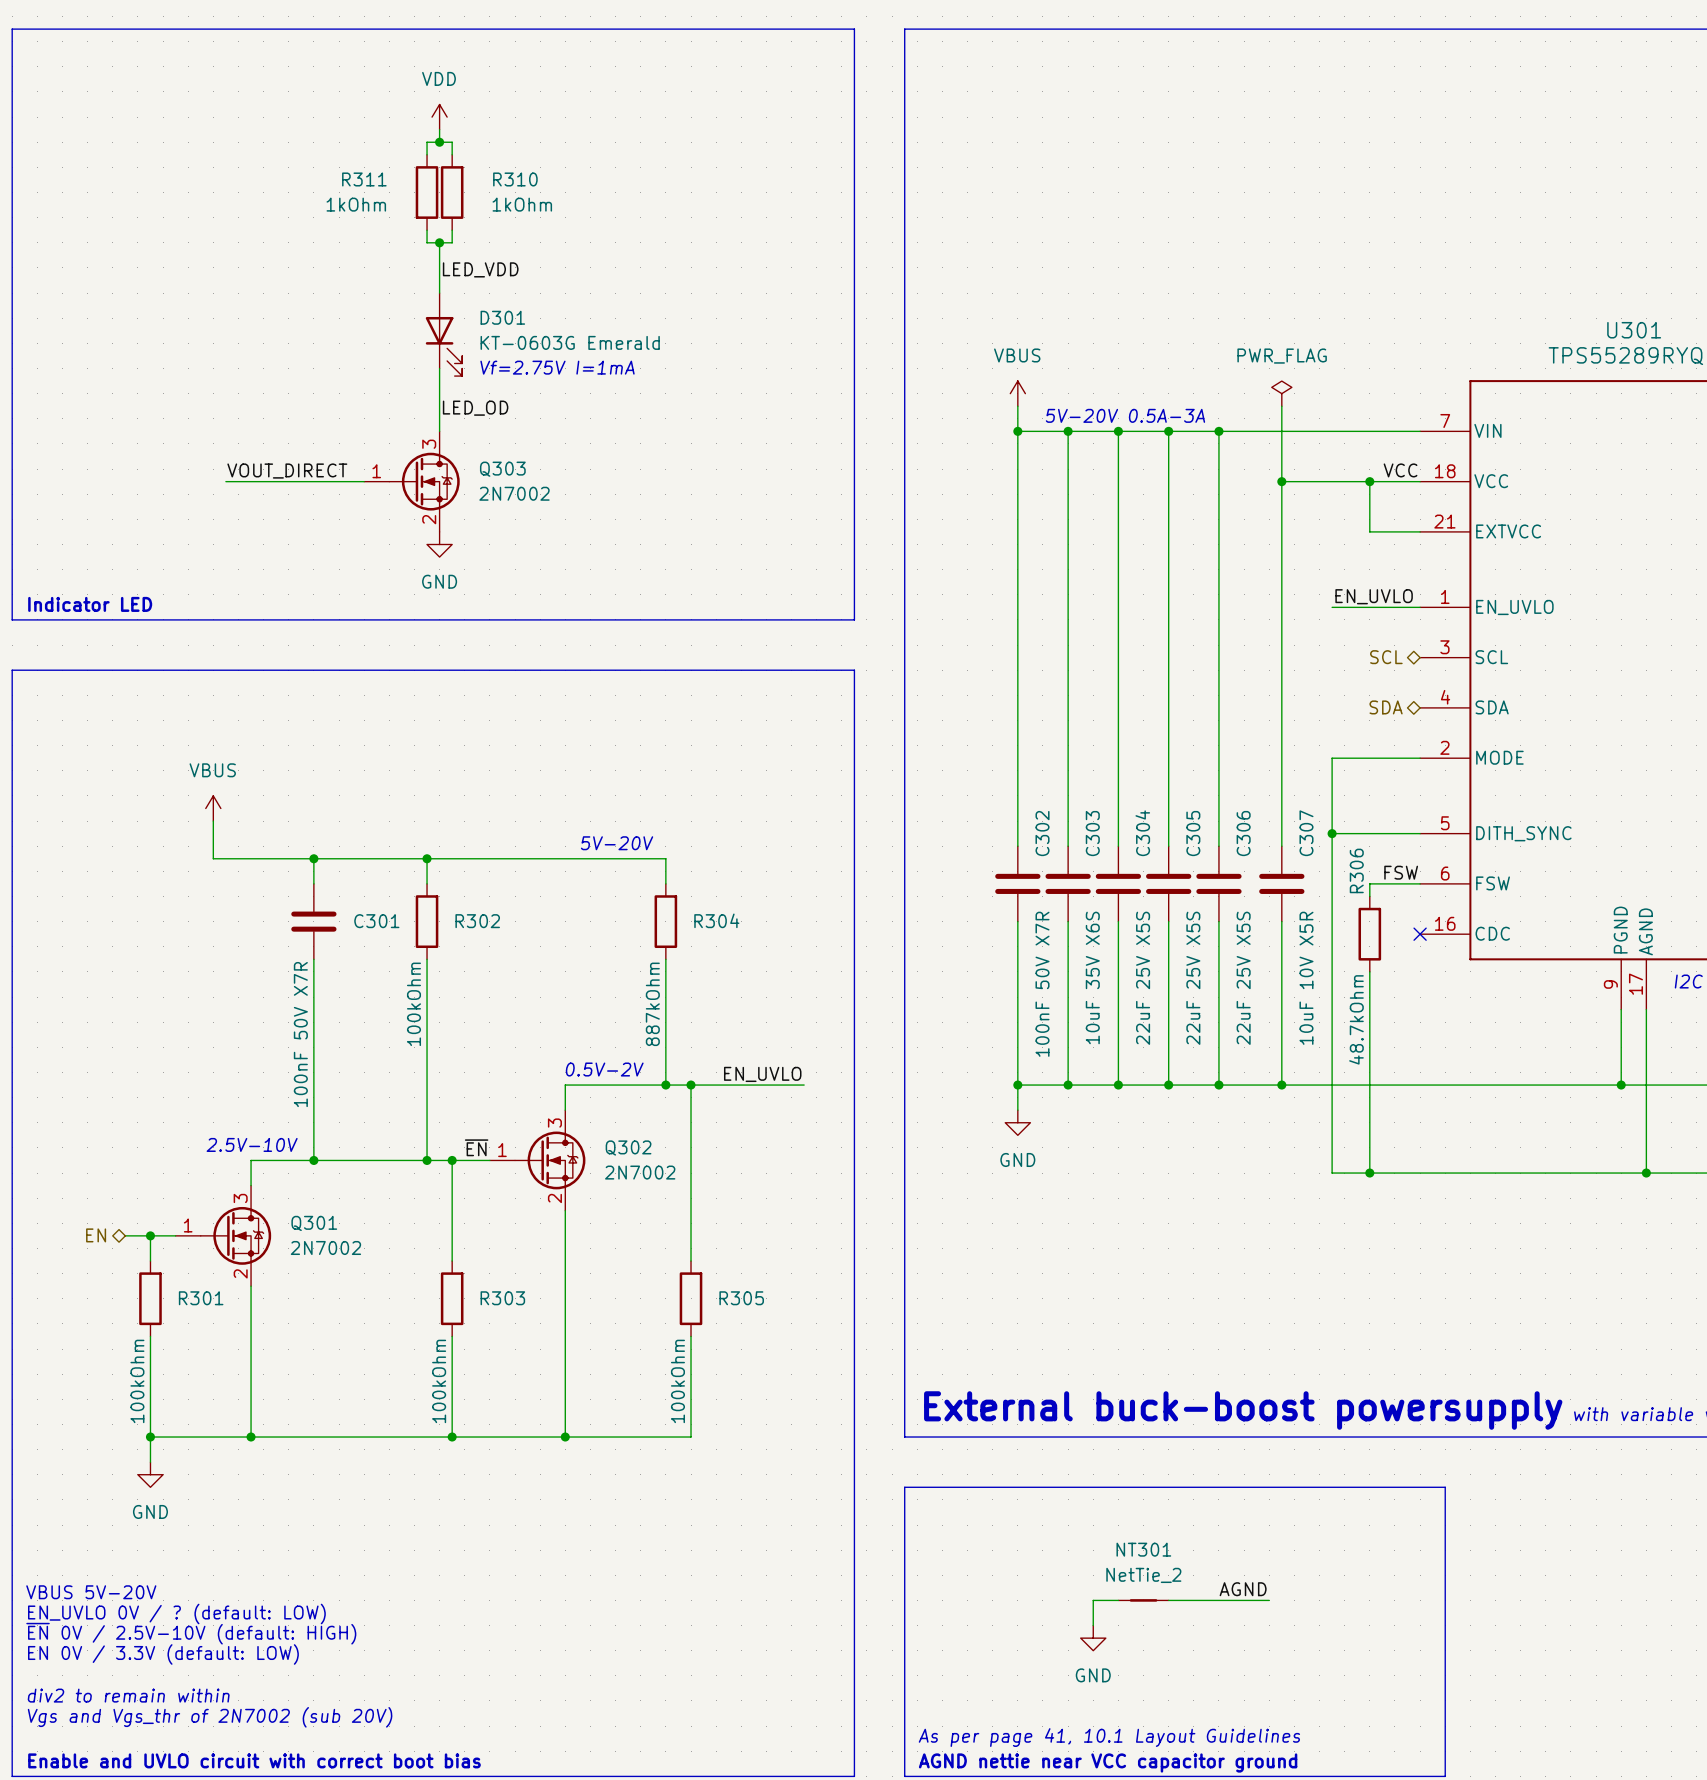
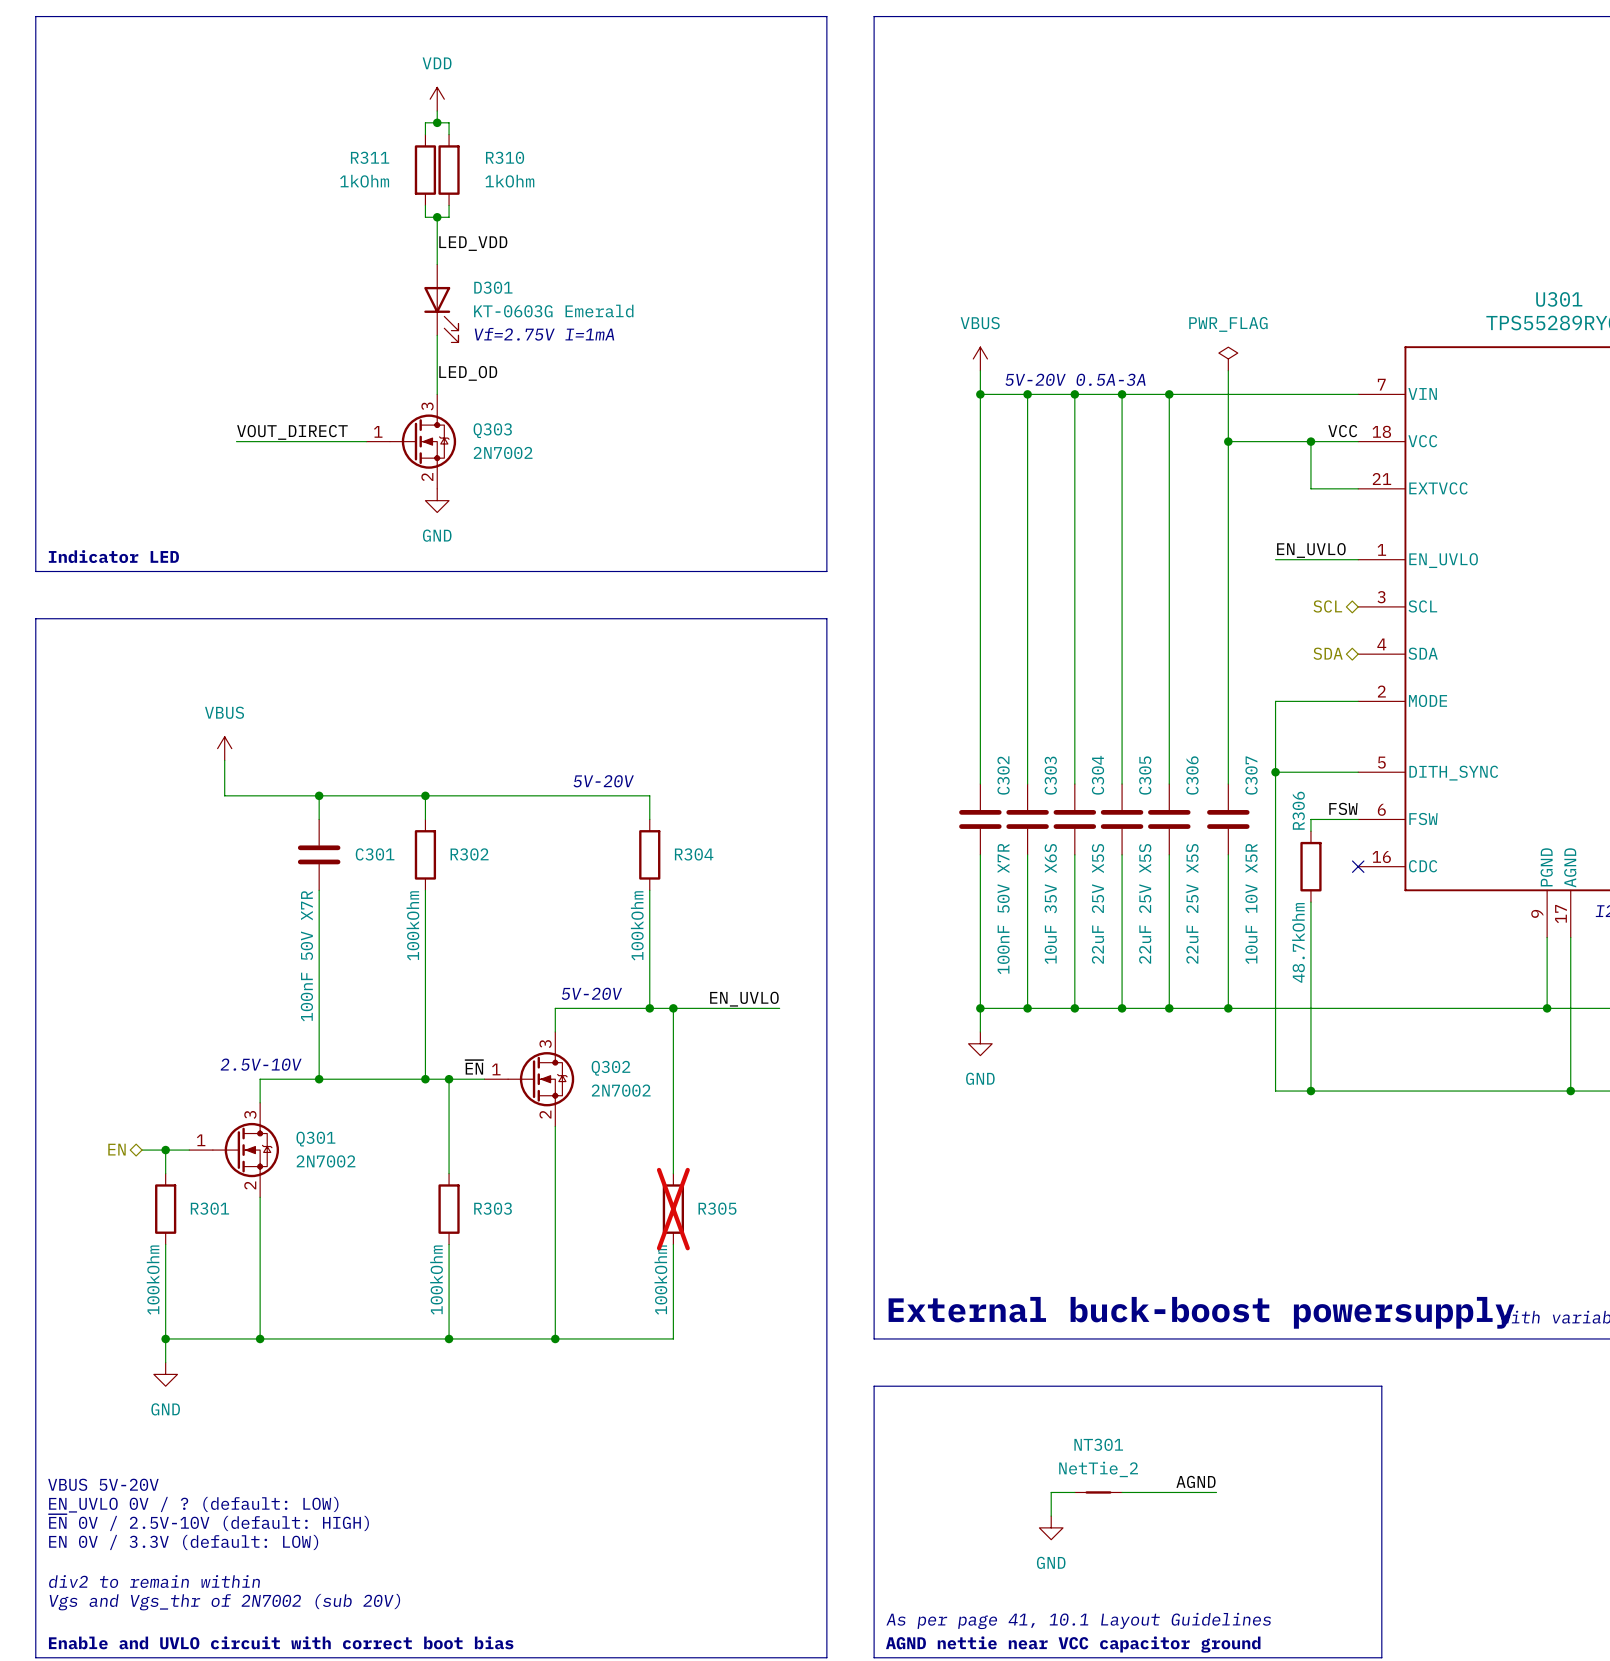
R304 value: 887kOhm (652, 1004) -> 100kOhm (637, 925)
text: 0.5V-2V (604, 1069) -> 5V-20V (591, 993)
R305 do-not-place cross: none -> (673, 1209)

